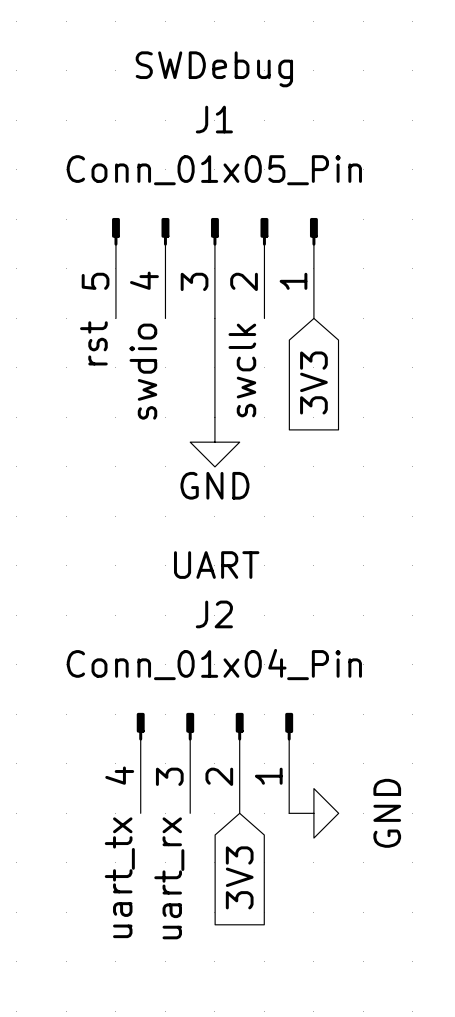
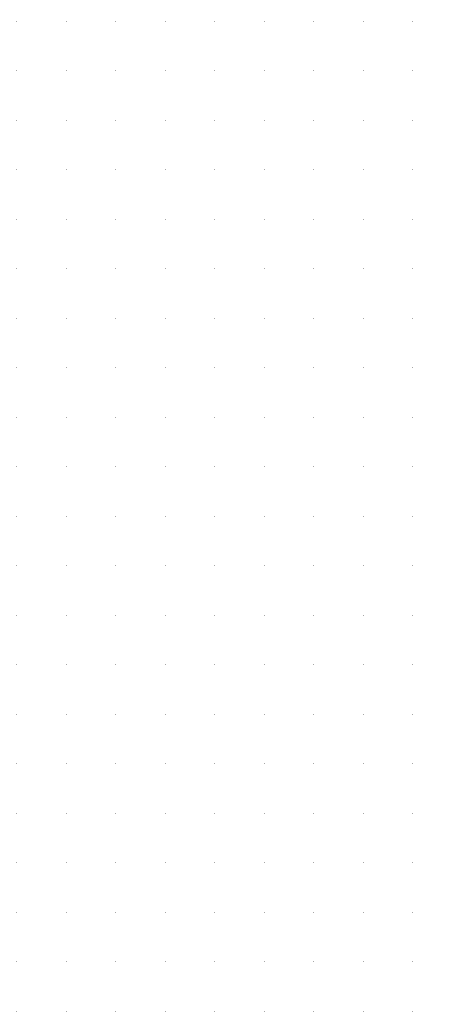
text: SWDebug (214, 69) -> none
J1: Conn_01x05_Pin (214, 268) -> none
wire: (214, 318) (214, 417) -> none
label: rst (93, 343) -> none
label: swclk (242, 370) -> none
label: swdio (143, 371) -> none
global label: 3V3 (313, 382) -> none
power symbol: GND (214, 442) -> none
text: UART (216, 565) -> none
J2: Conn_01x04_Pin (214, 763) -> none
power symbol: GND (313, 813) -> none
label: uart_tx (119, 877) -> none
global label: 3V3 (239, 877) -> none
label: uart_rx (169, 878) -> none

